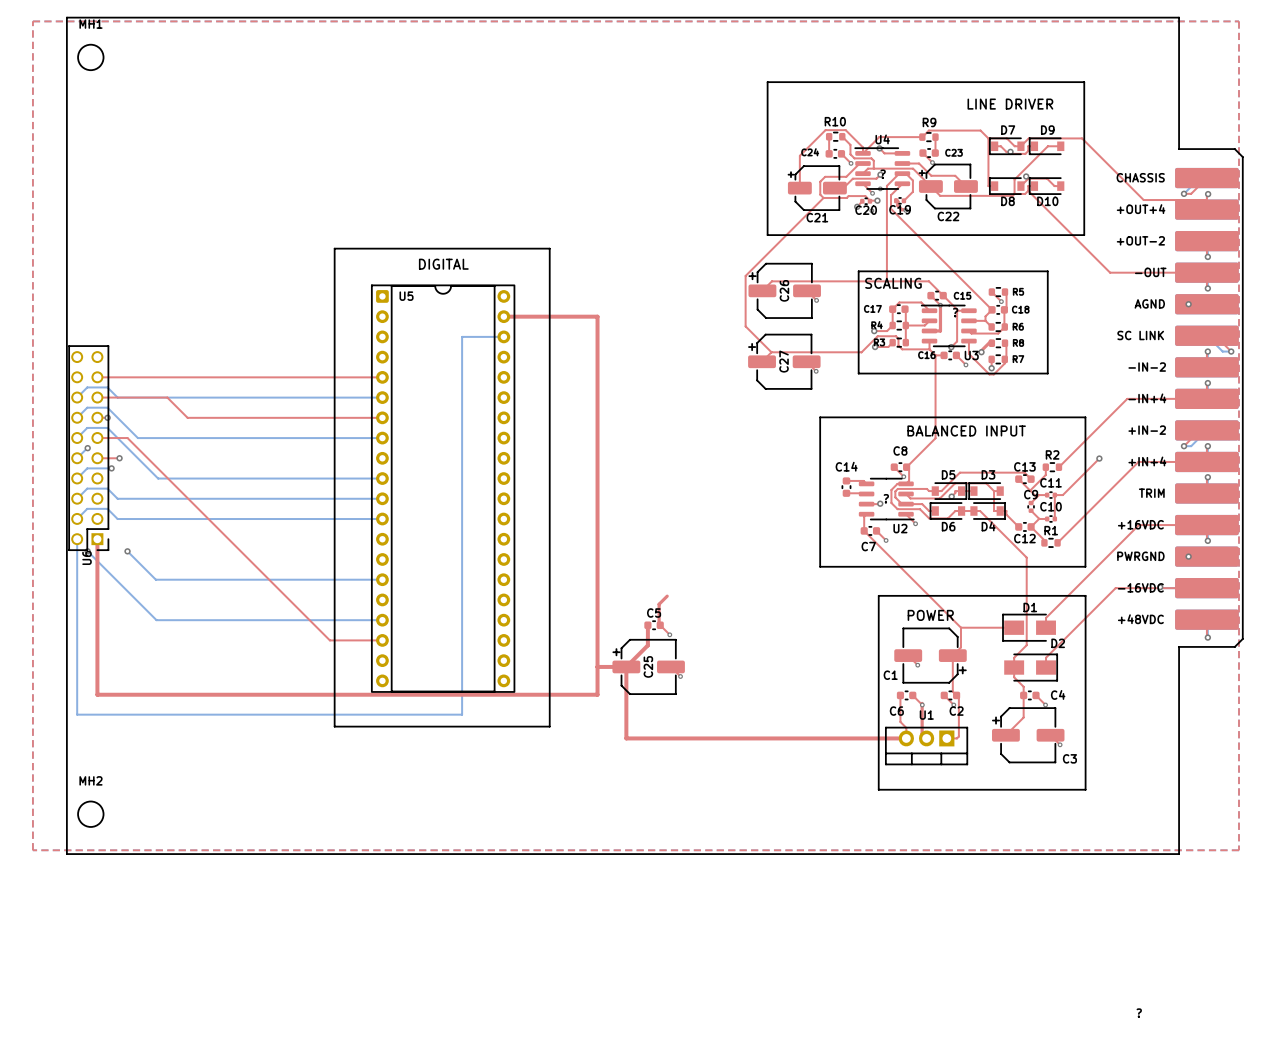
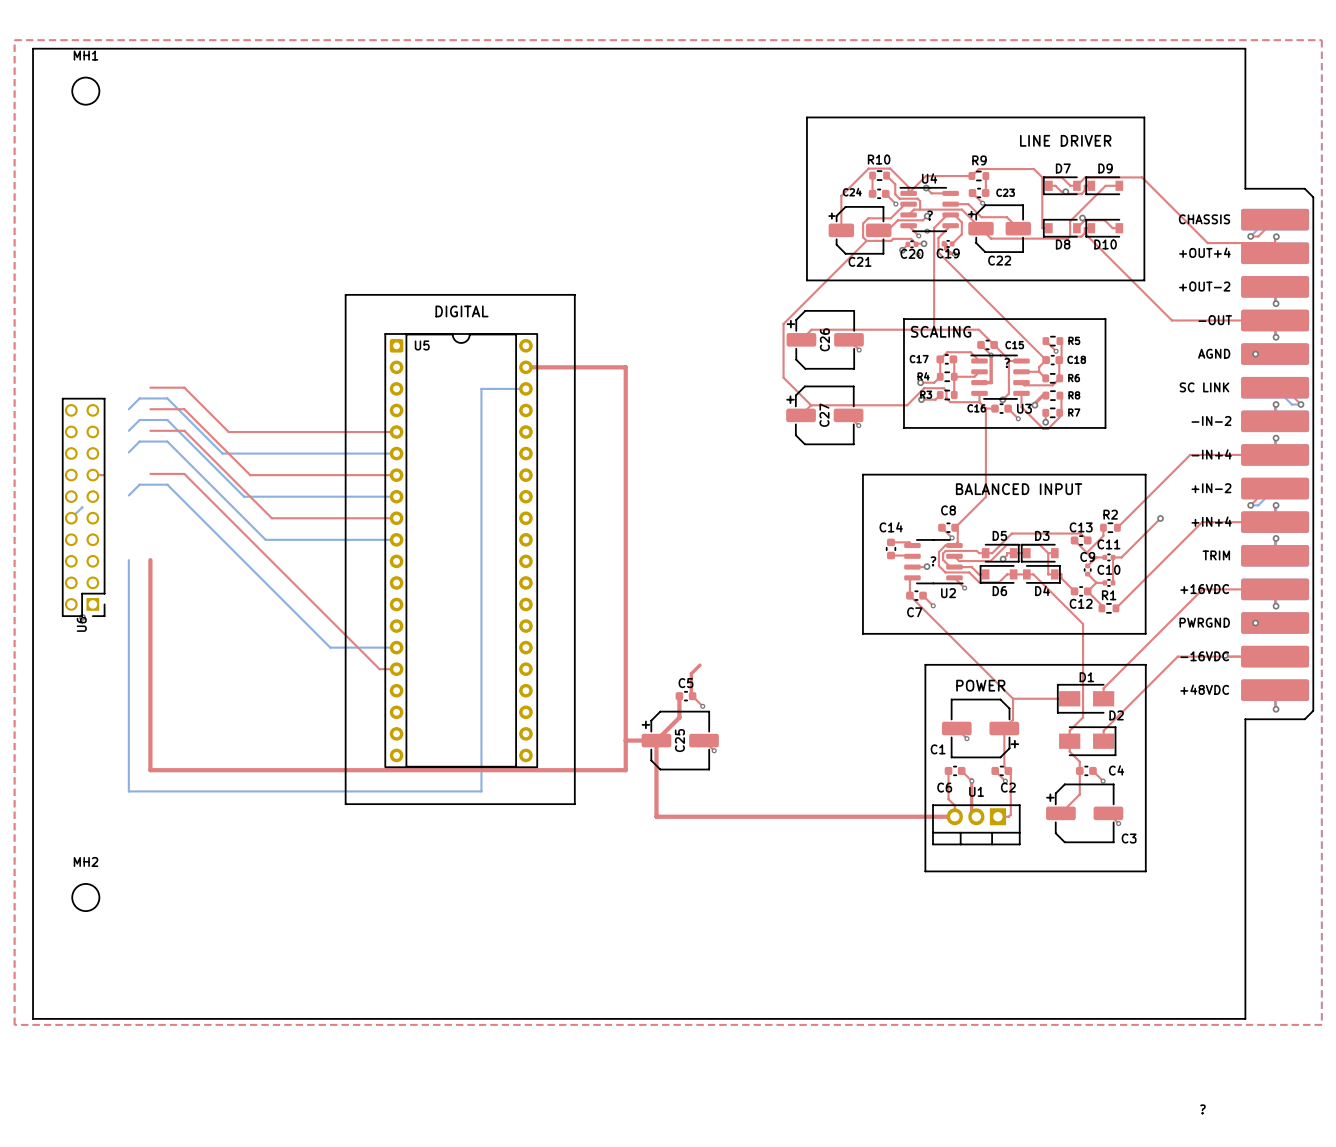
board edge: (66, 17) (66, 854) (1179, 854) -> (60, 48) (33, 48) (33, 1018) (1245, 1018) (1245, 939)
top zone outline: (32, 21) (1239, 21) (1239, 850) (32, 850) (32, 21) -> (14, 40) (14, 1024) (1321, 1024) (1321, 40) (14, 40)
top track: none -> (150, 430) (184, 430) (271, 518) (396, 518)
top track: (97, 377) (382, 377) -> (150, 387) (184, 387) (228, 432) (396, 432)
bottom track: (77, 397) (87, 387) (107, 387) (117, 397) (219, 397) -> (128, 409) (139, 398) (167, 398) (222, 453)
top track: (97, 397) (167, 397) (187, 417) (245, 417) -> (150, 409) (184, 409) (250, 475)
top track: none -> (150, 473) (184, 473) (379, 669) (396, 669)
bottom track: (77, 417) (87, 407) (107, 407) (137, 438) (239, 438) -> (128, 430) (139, 420) (167, 420) (244, 496)
via: (107, 417) -> none
bottom track: (77, 438) (87, 427) (107, 427) (158, 478) (259, 478) -> (128, 452) (139, 441) (167, 441) (265, 539)
top track: (97, 438) (127, 438) (329, 640) (382, 640) -> none
via: (87, 448) -> none
top track: (97, 458) (119, 458) -> none
via: (119, 458) -> none
bottom track: (111, 468) (87, 468) (77, 478) -> none
via: (111, 468) -> none
bottom track: (77, 498) (87, 488) (107, 488) (117, 498) (382, 498) -> none
bottom track: (77, 518) (87, 508) (107, 508) (117, 519) (382, 519) -> none
bottom track: (77, 539) (77, 714) (131, 714) -> (128, 560) (128, 791)
top track: (97, 539) (97, 694) (151, 694) -> (150, 560) (150, 770)
bottom track: (87, 551) (156, 620) (382, 620) -> none
bottom track: (127, 551) (155, 579) (320, 579) -> (128, 495) (139, 484) (167, 484) (330, 647)
via: (127, 551) -> none

